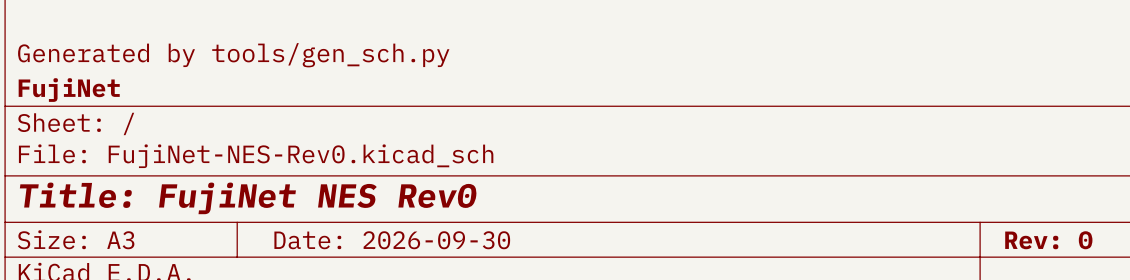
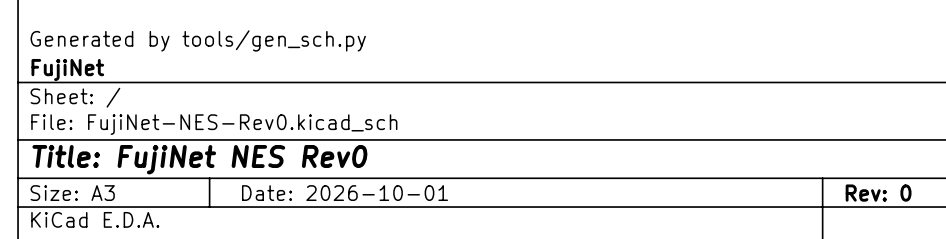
title block: Date: 2026-09-30 (392, 240) -> Date: 2026-10-01 (345, 193)

